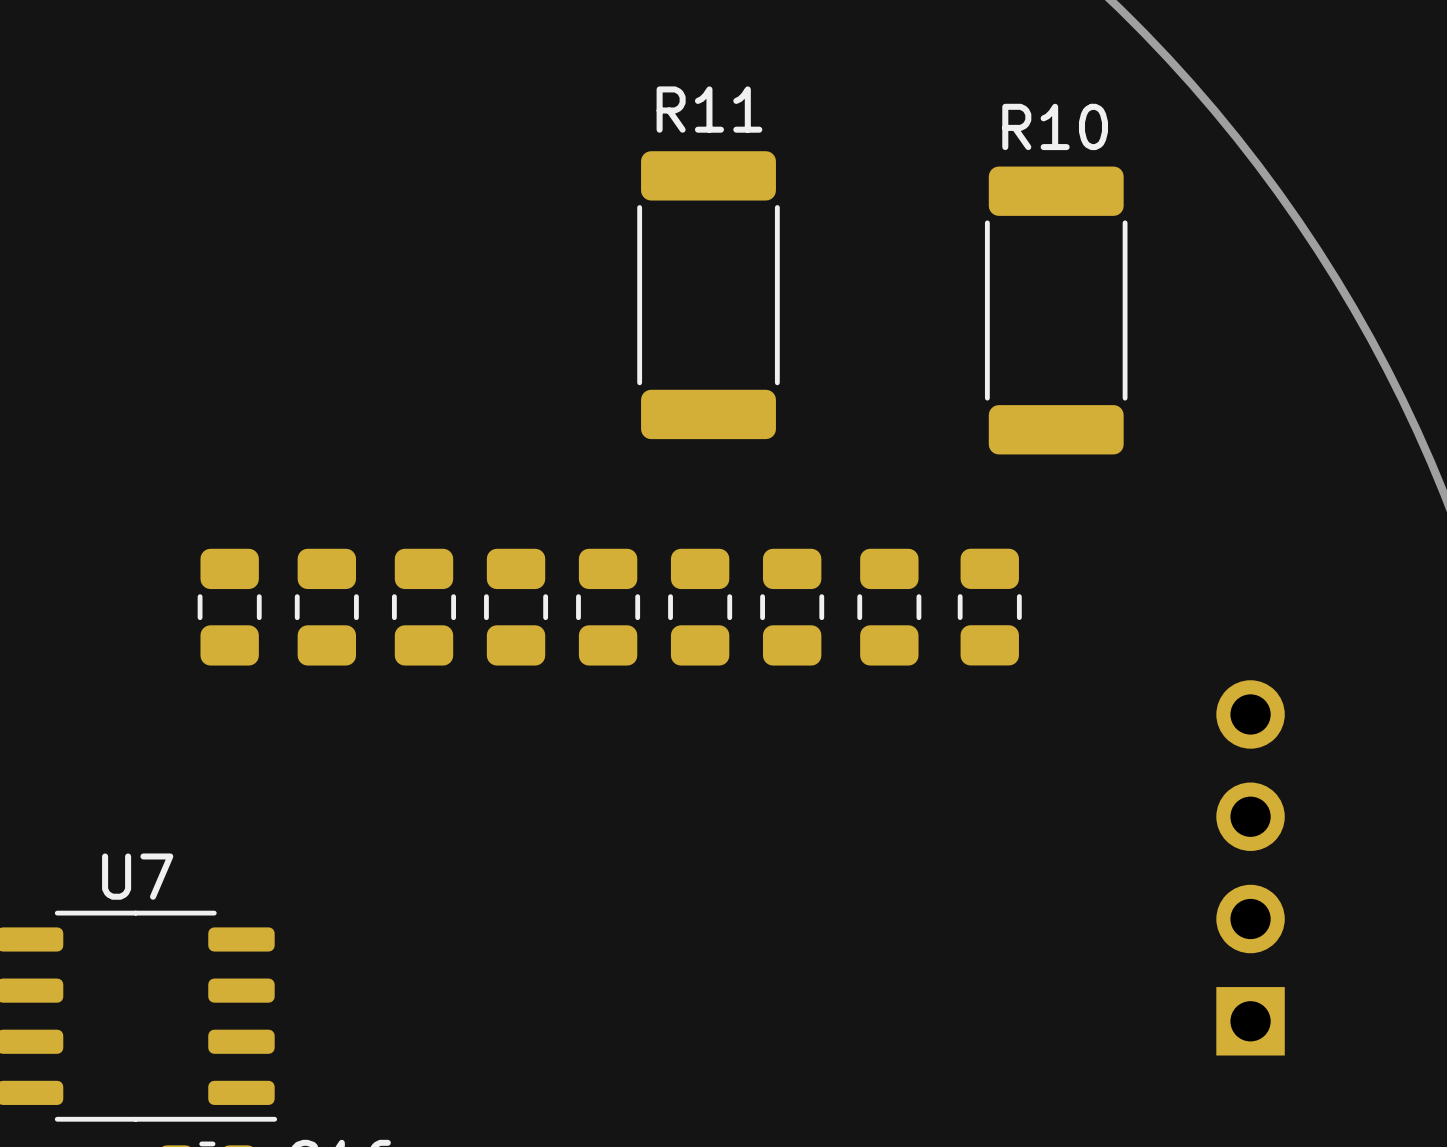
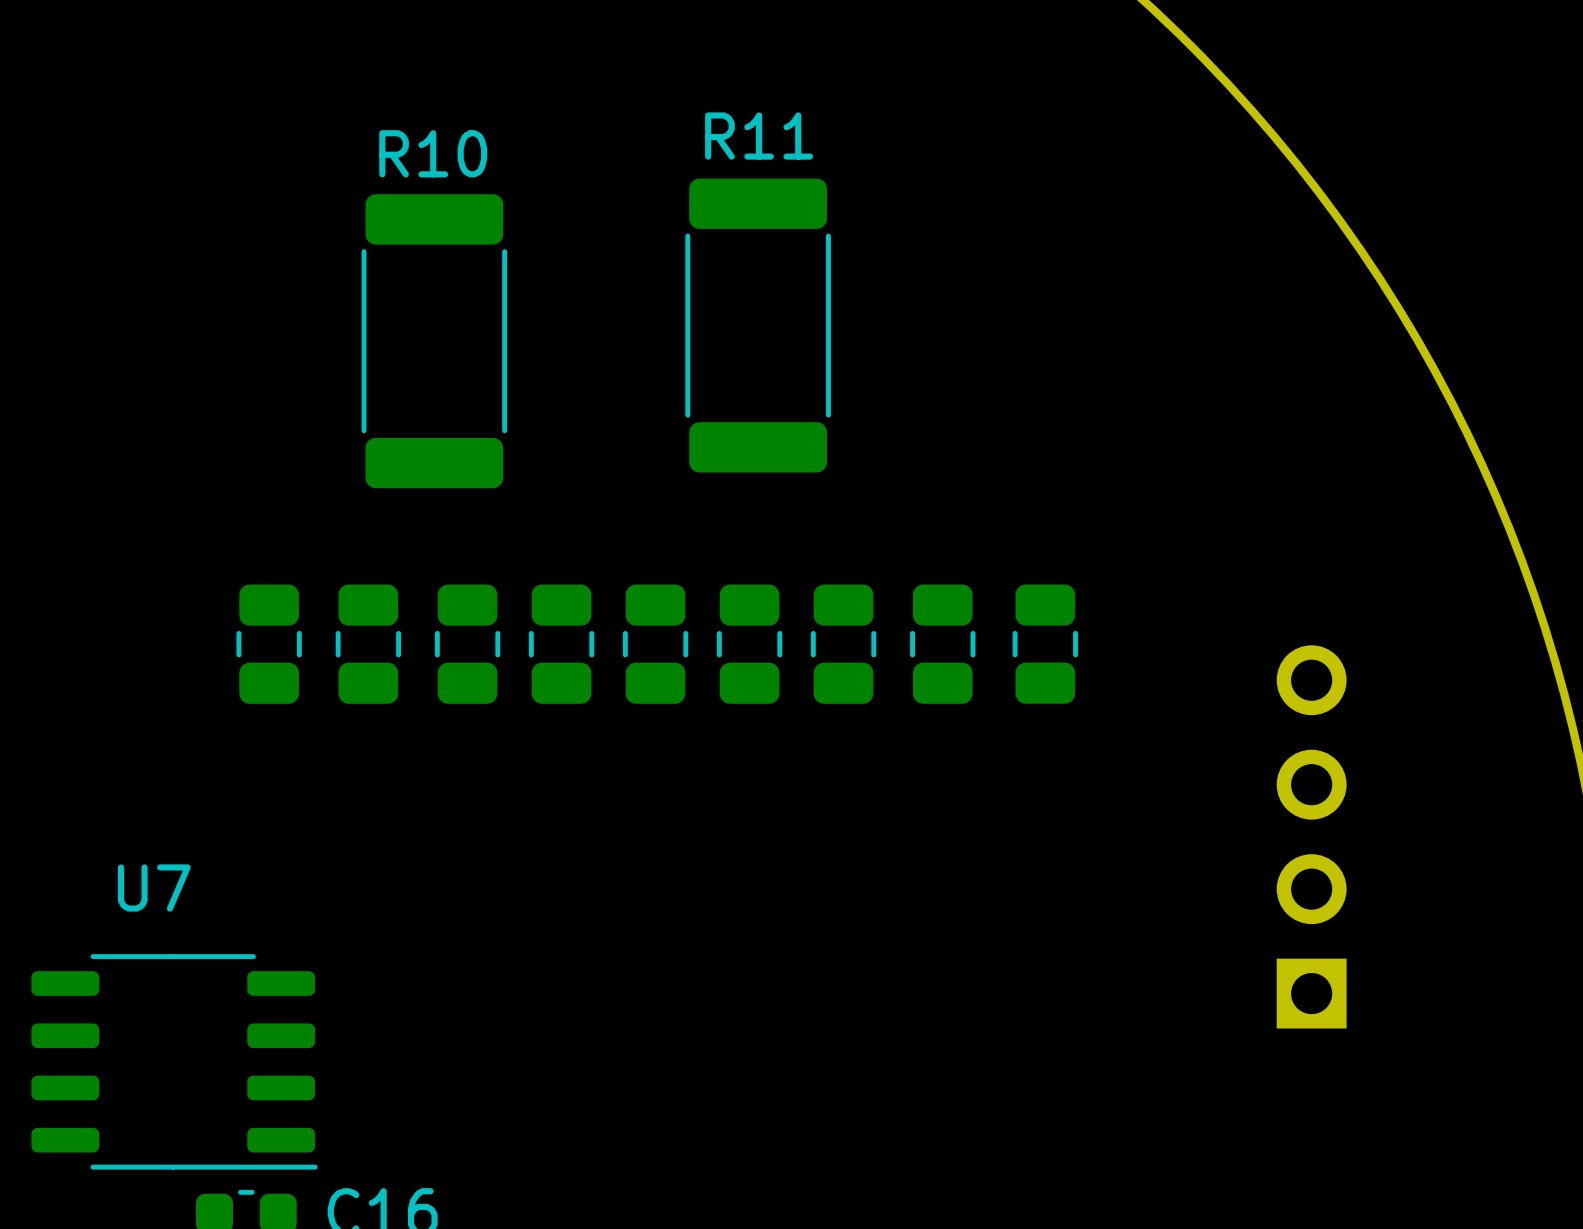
R10 position: (1056, 310) -> (434, 341)
part position: (1250, 867) -> (1311, 836)
U7 name position: U7 (137, 876) -> U7 (154, 888)

